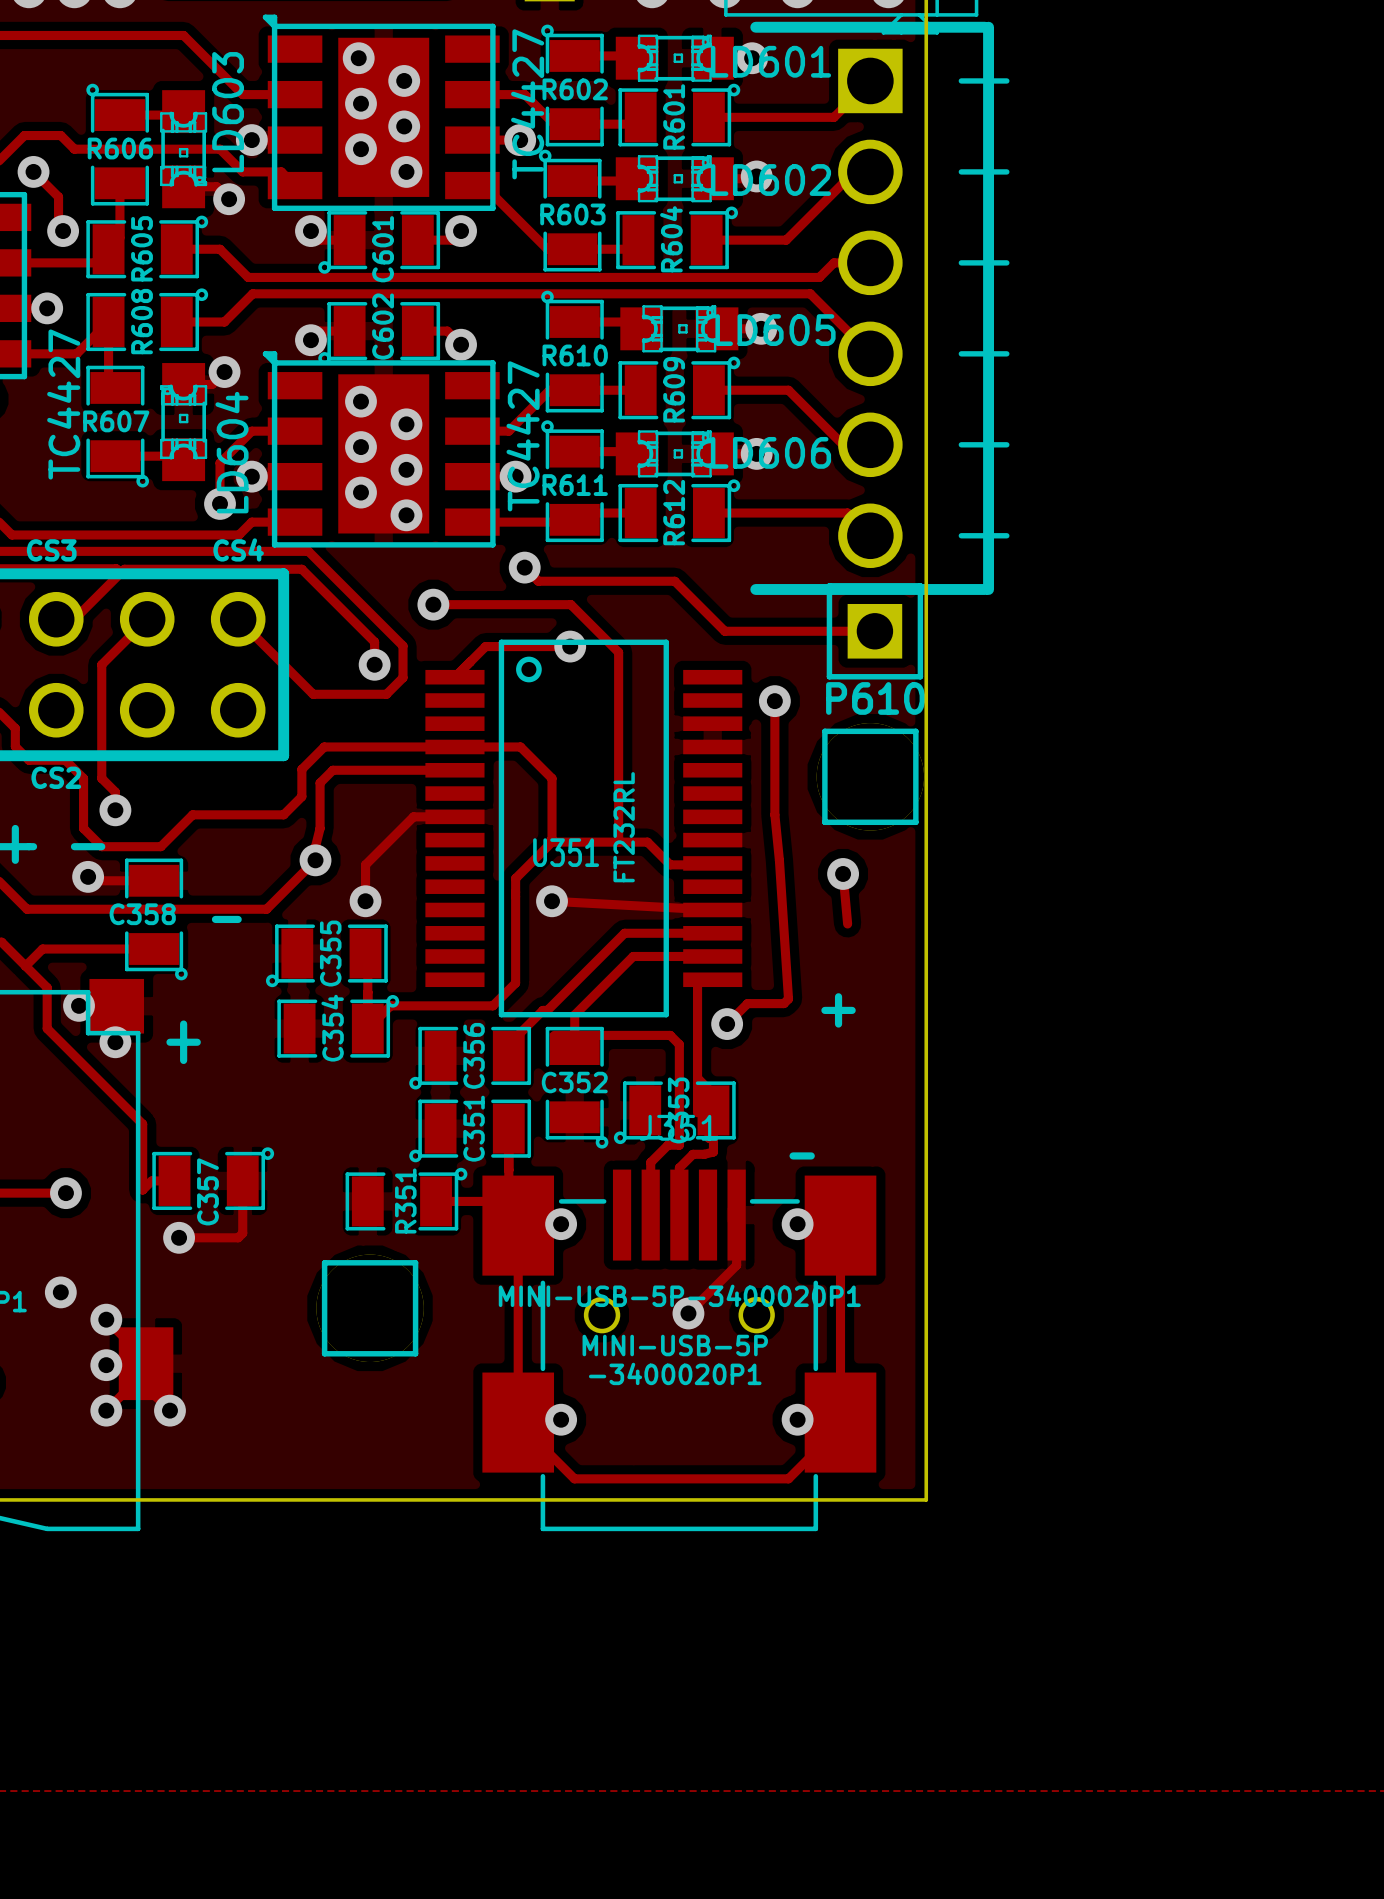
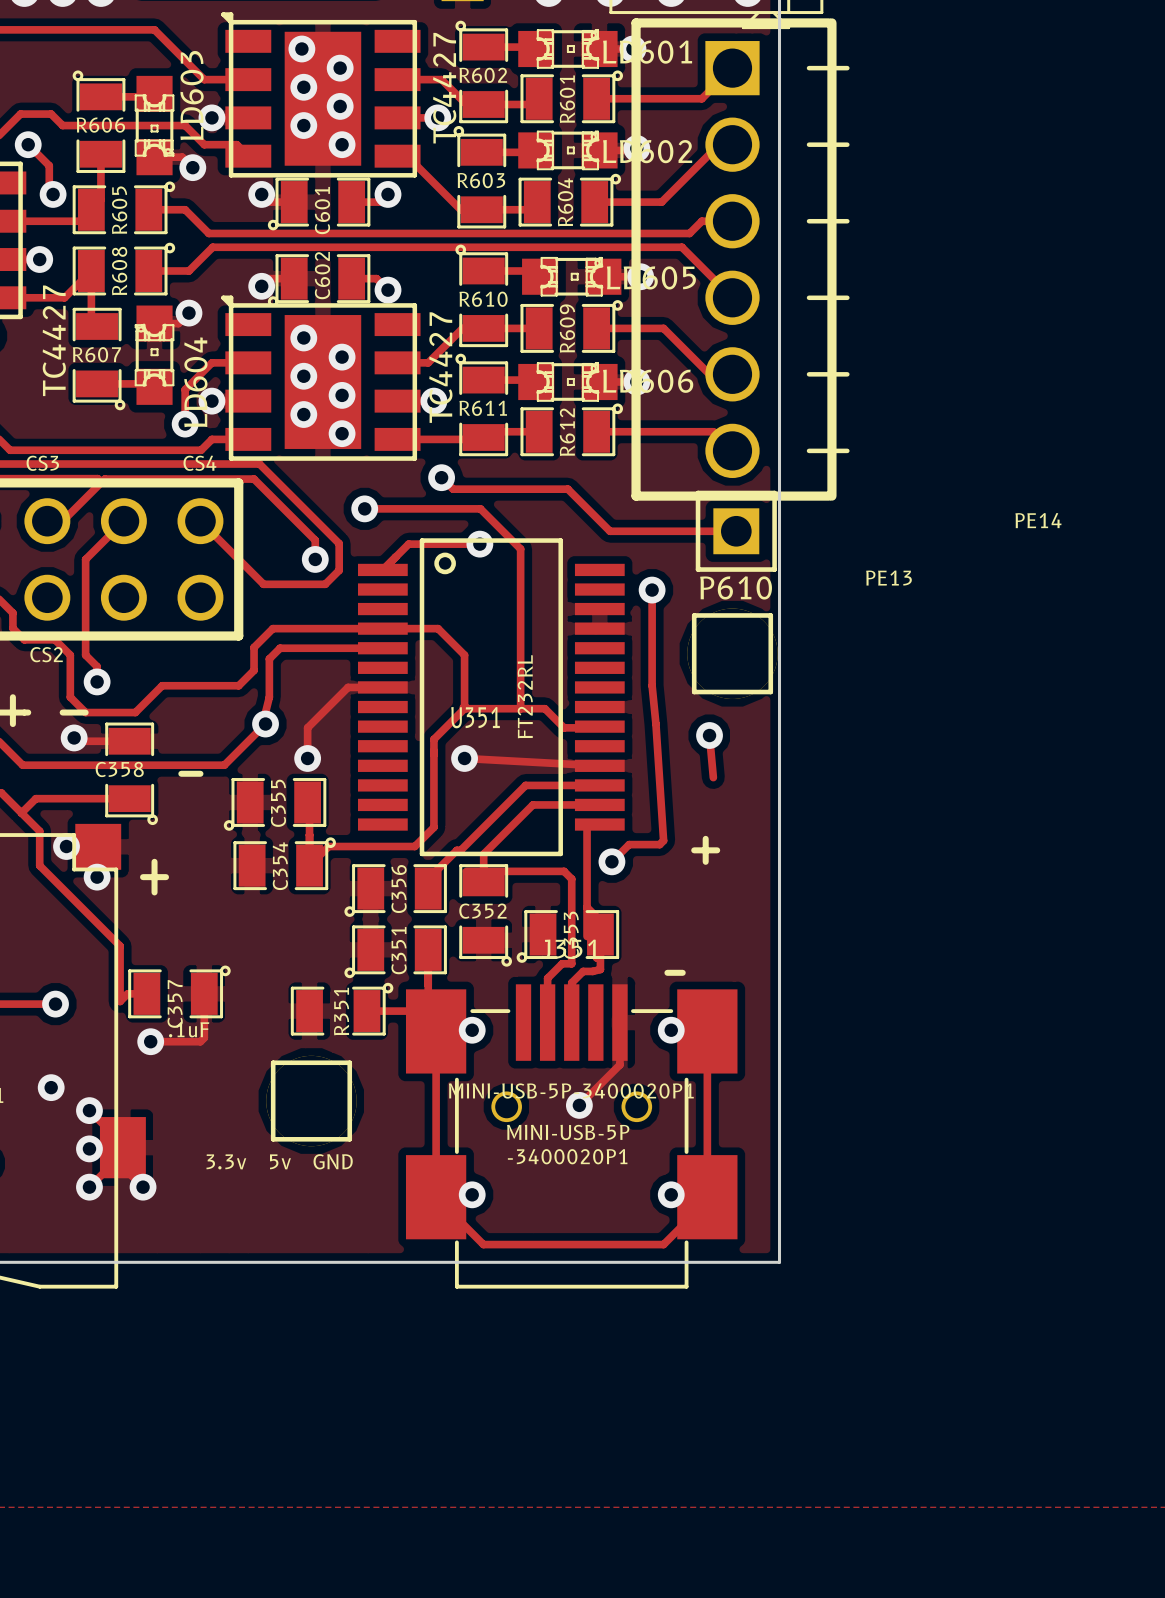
part footprint: [750, 21, 1010, 595] -> [631, 18, 850, 501]
text: none -> PE14 (1038, 520)
text: none -> PE13 (888, 578)
C357 value: none -> .1uF (189, 1029)
text: none -> 3.3v 5v GND (279, 1161)

